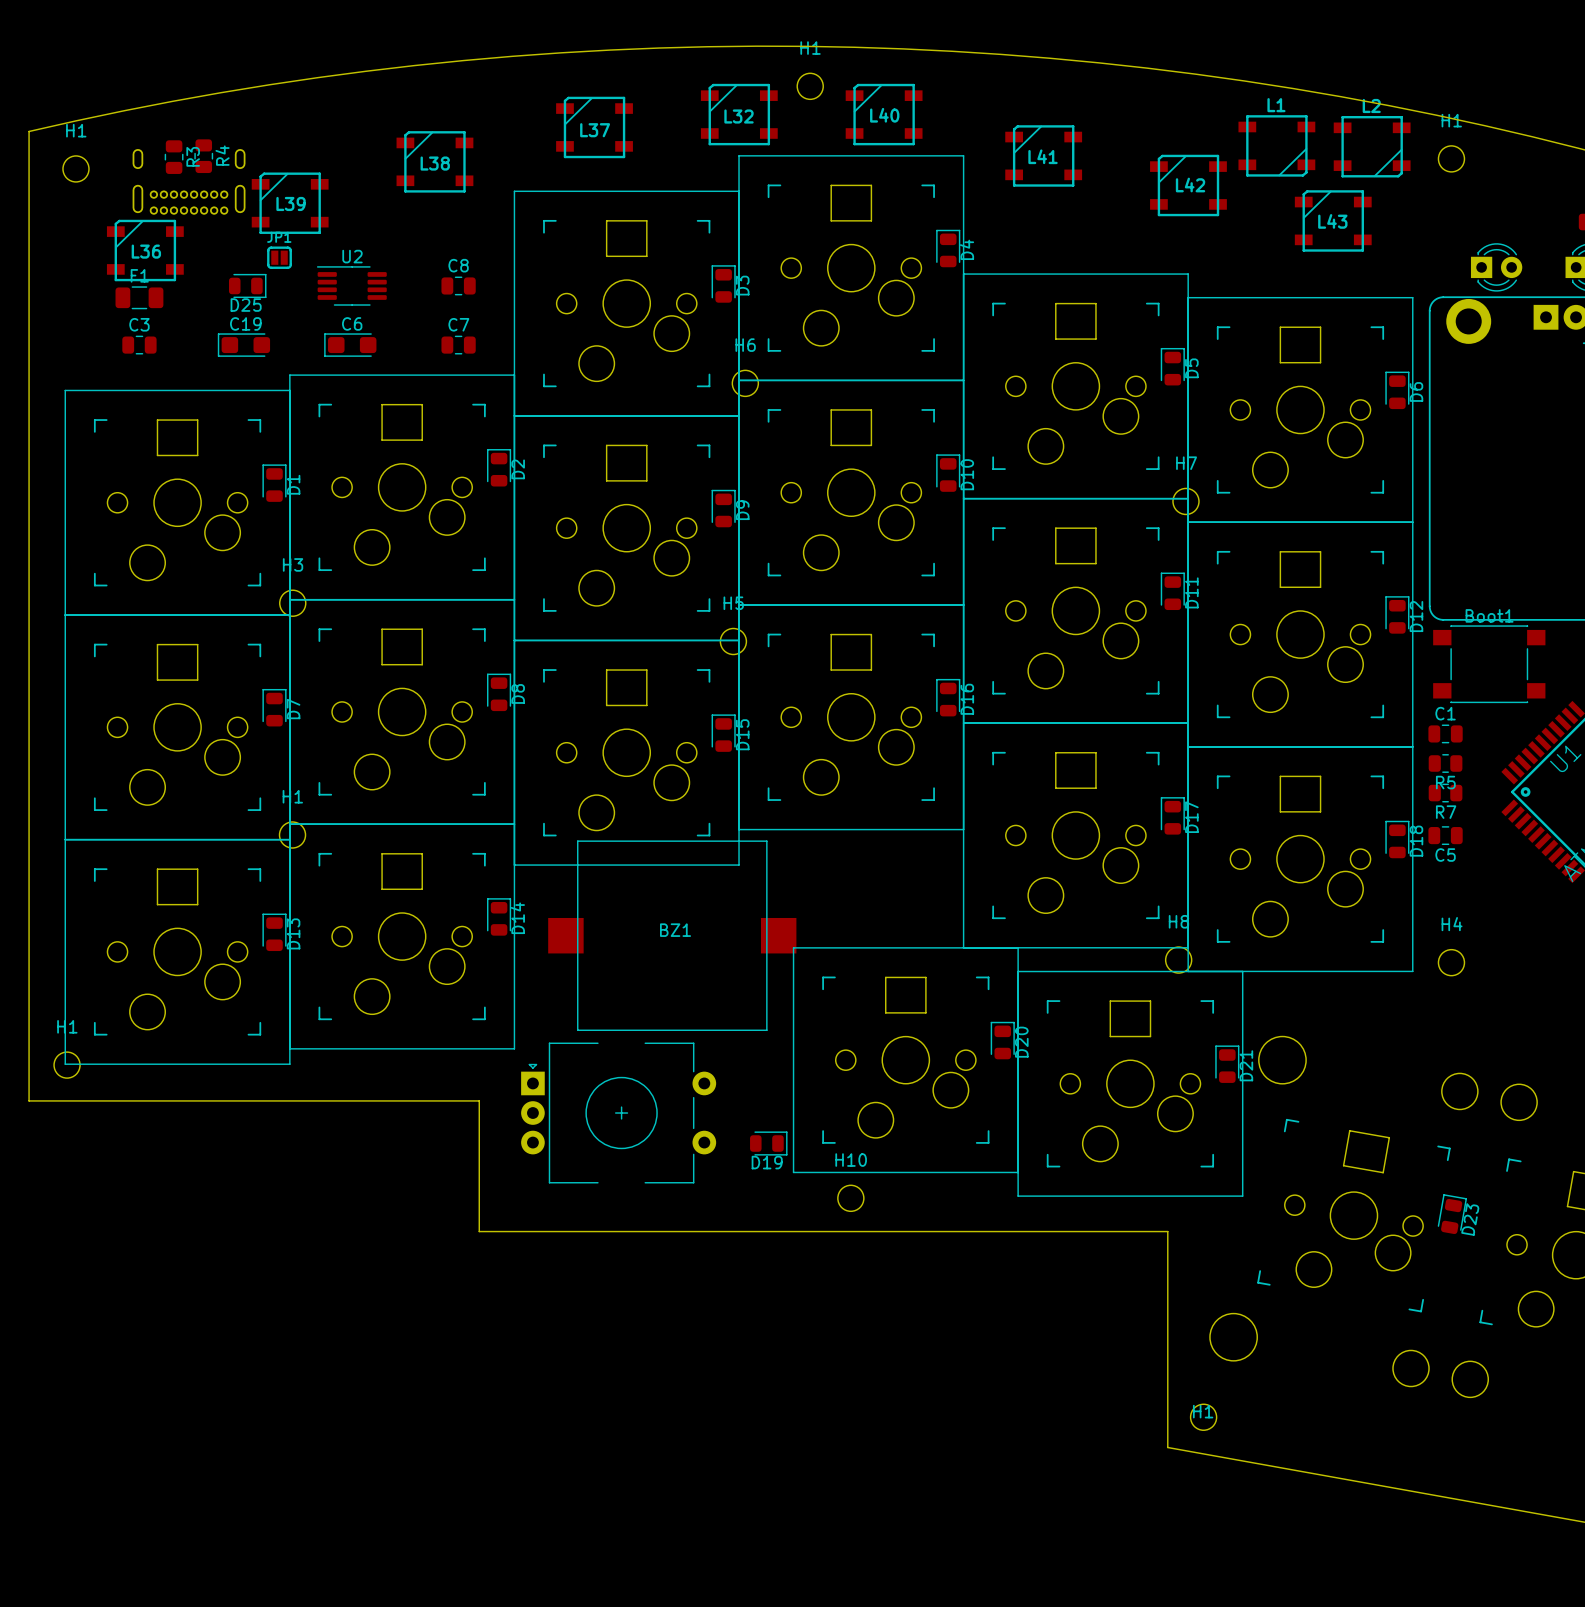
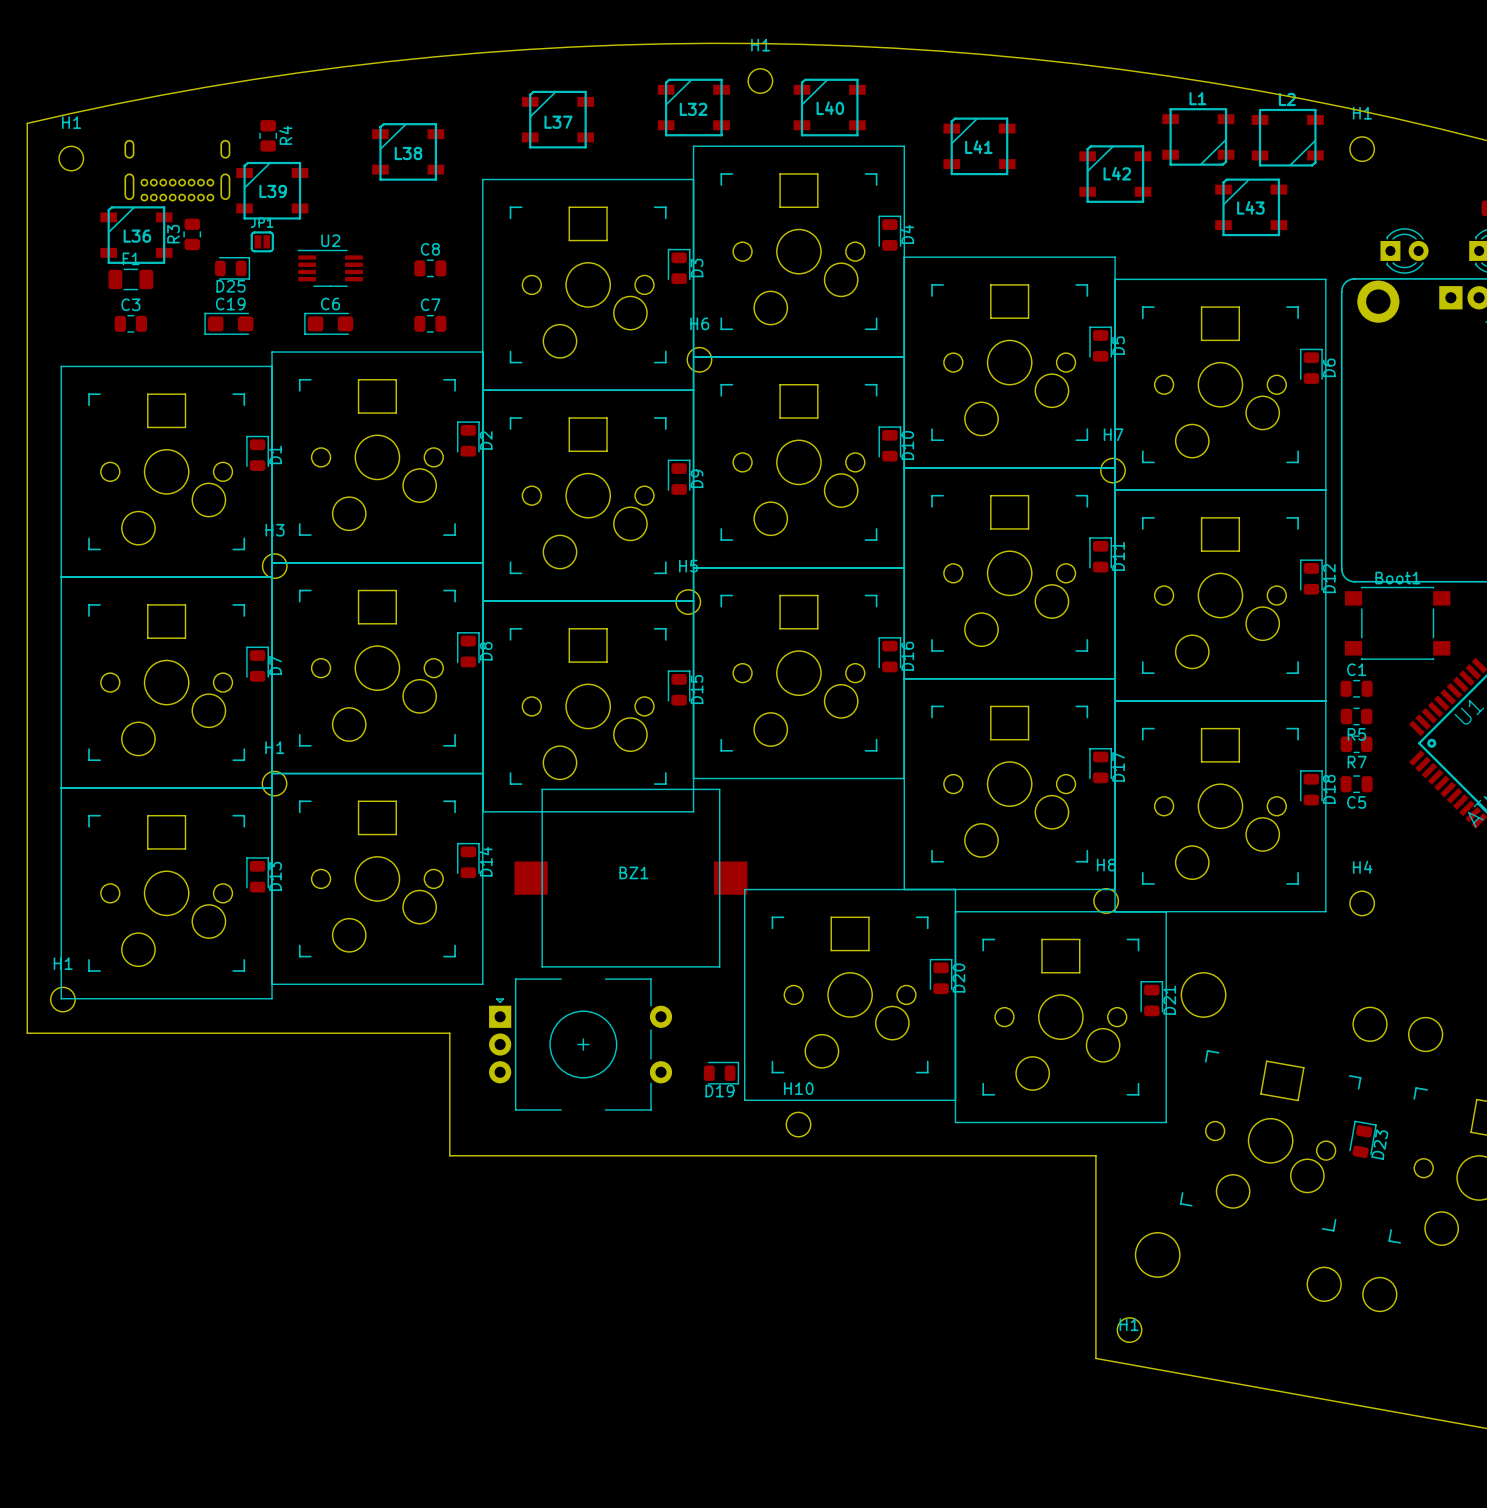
R3 name position: R3 (193, 156) -> R3 (173, 234)
R4 position: (203, 156) -> (268, 135)
R3 position: (174, 157) -> (192, 234)

